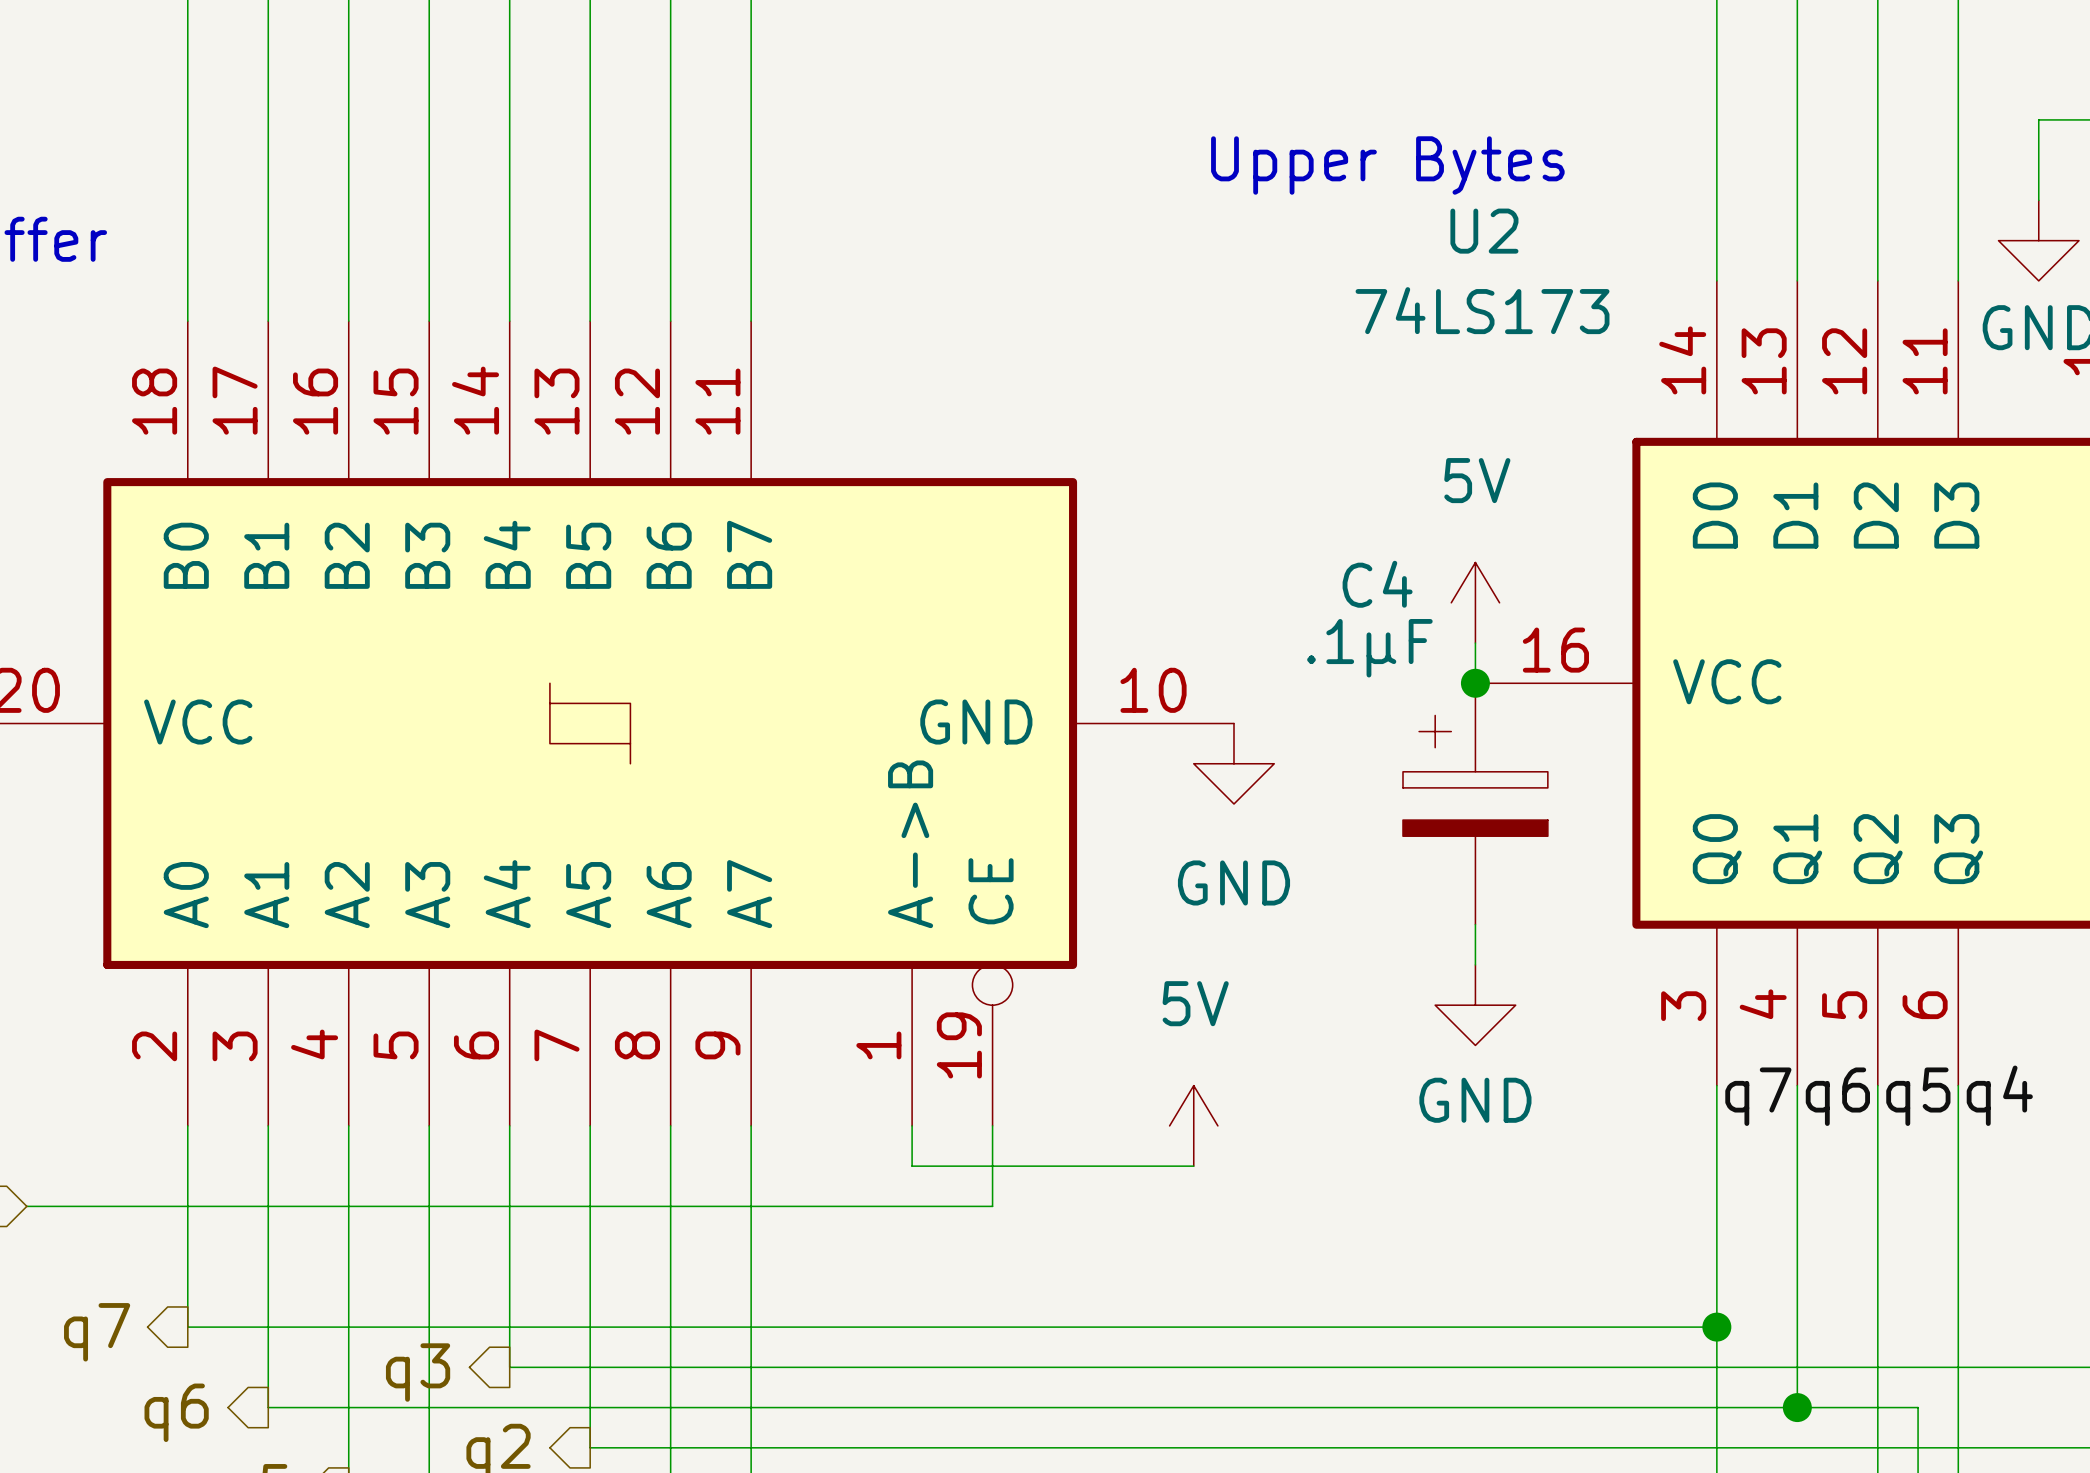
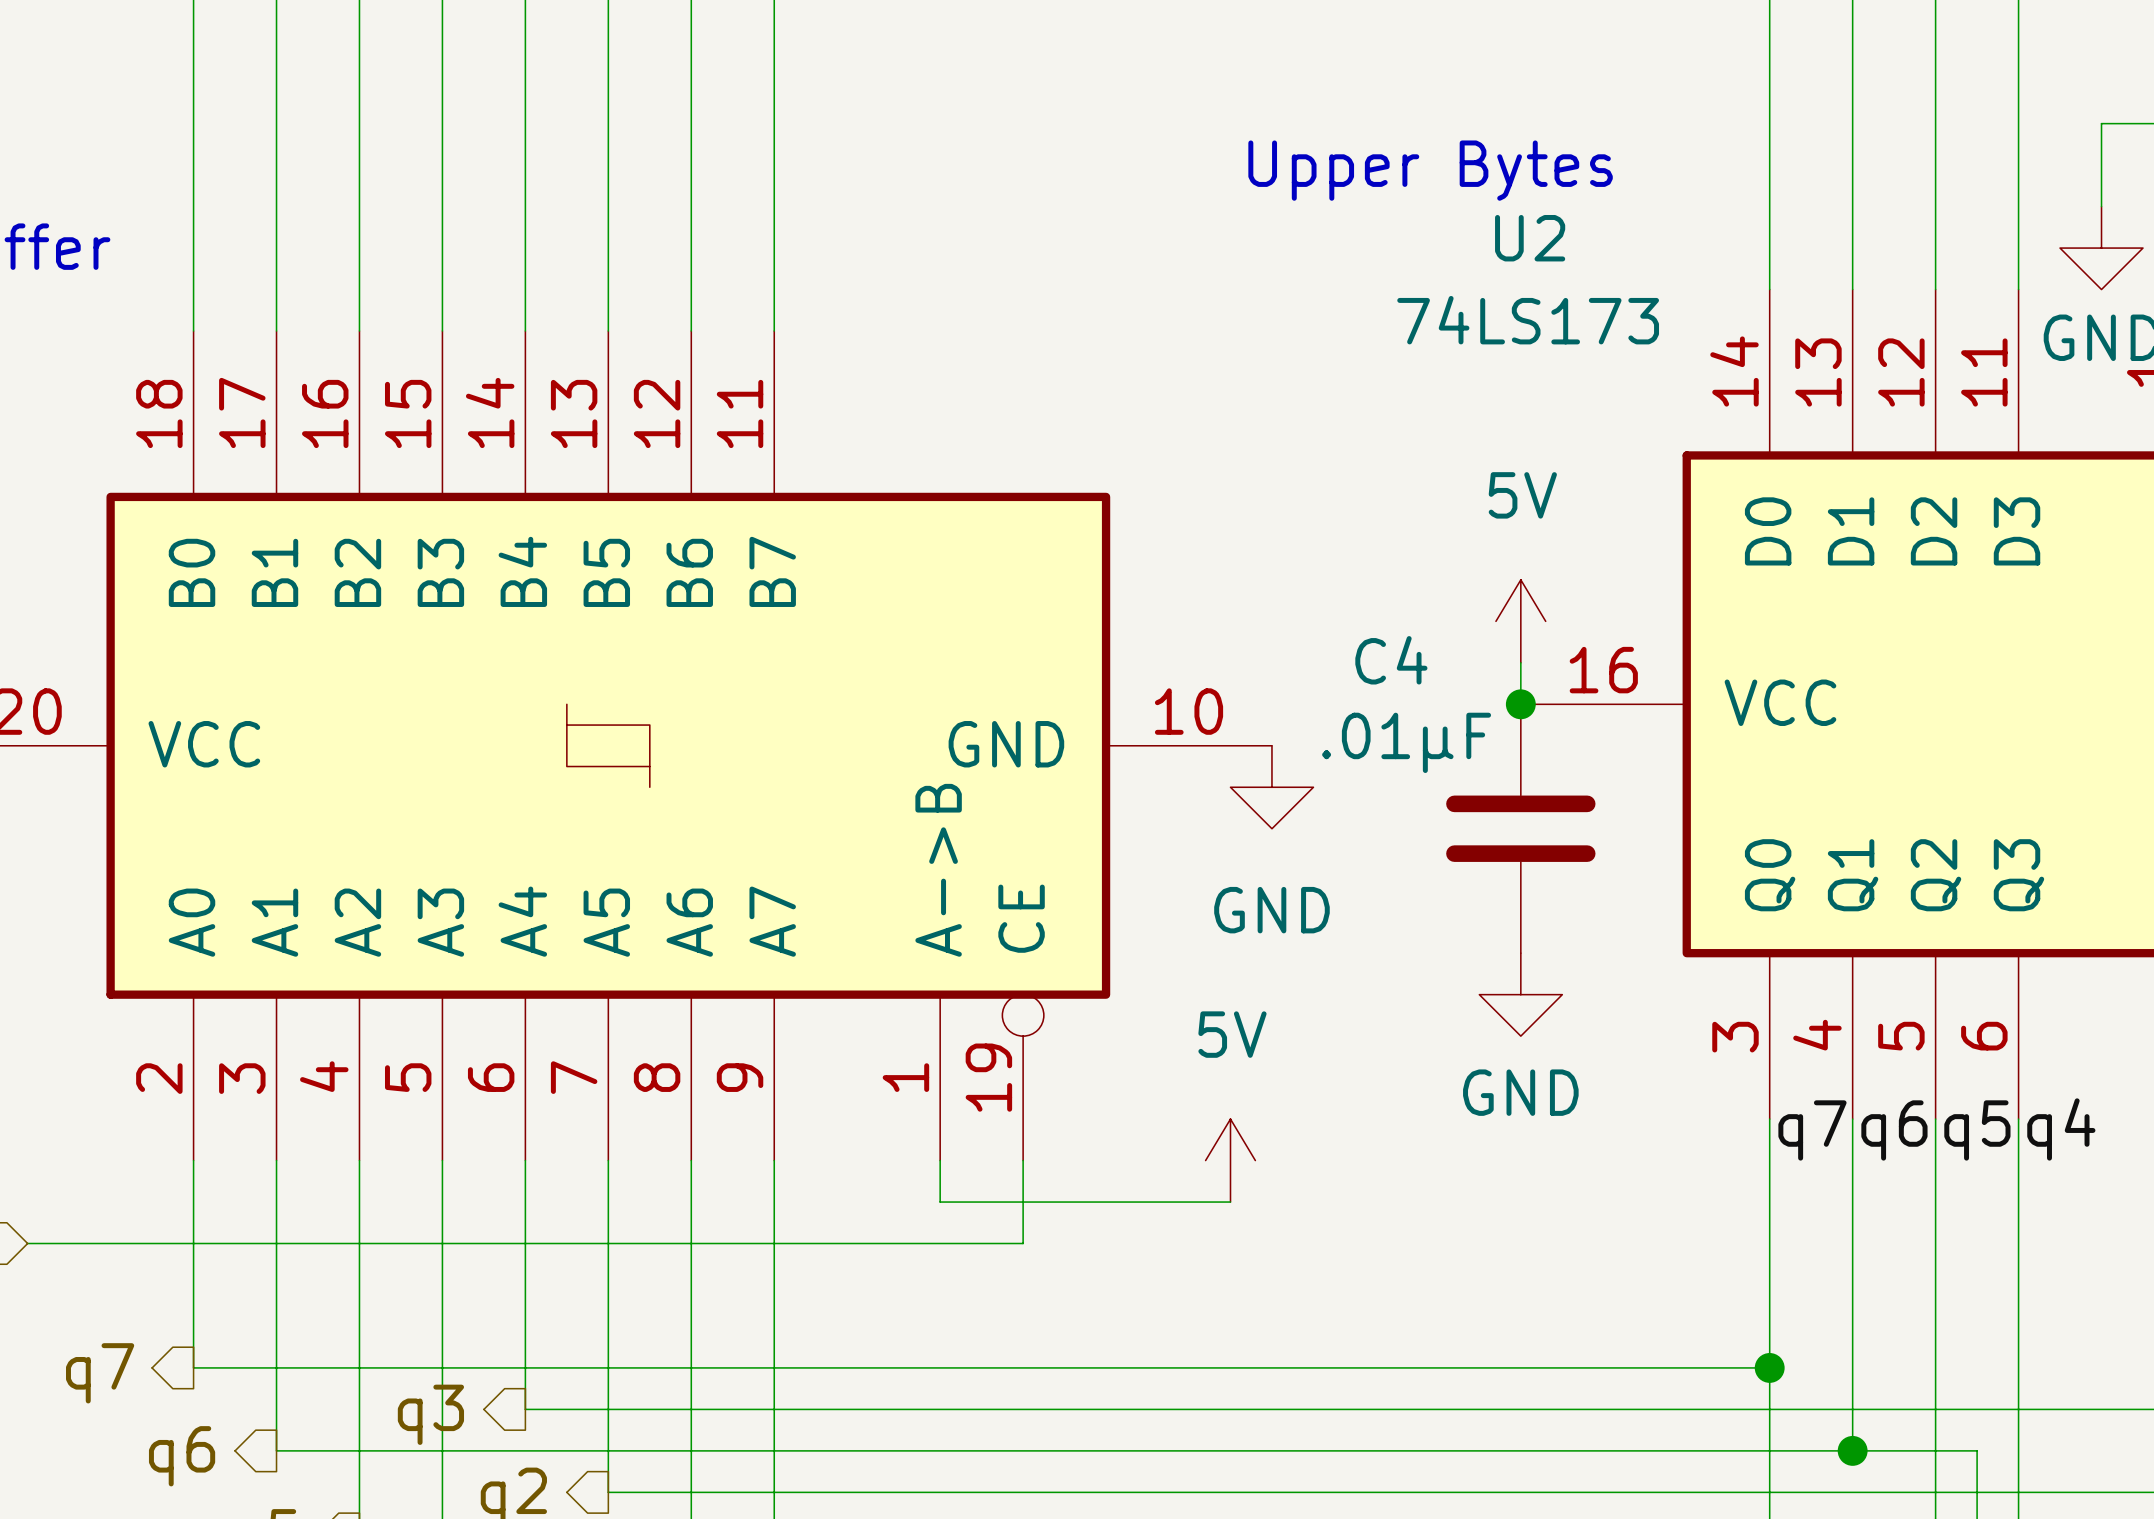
C4 value: .1µF (1369, 648) -> .01µF (1406, 742)
C4 symbol: [1402, 683, 1548, 925] -> [1446, 704, 1596, 954]
power symbol position: GND (1475, 1005) -> GND (1520, 994)

